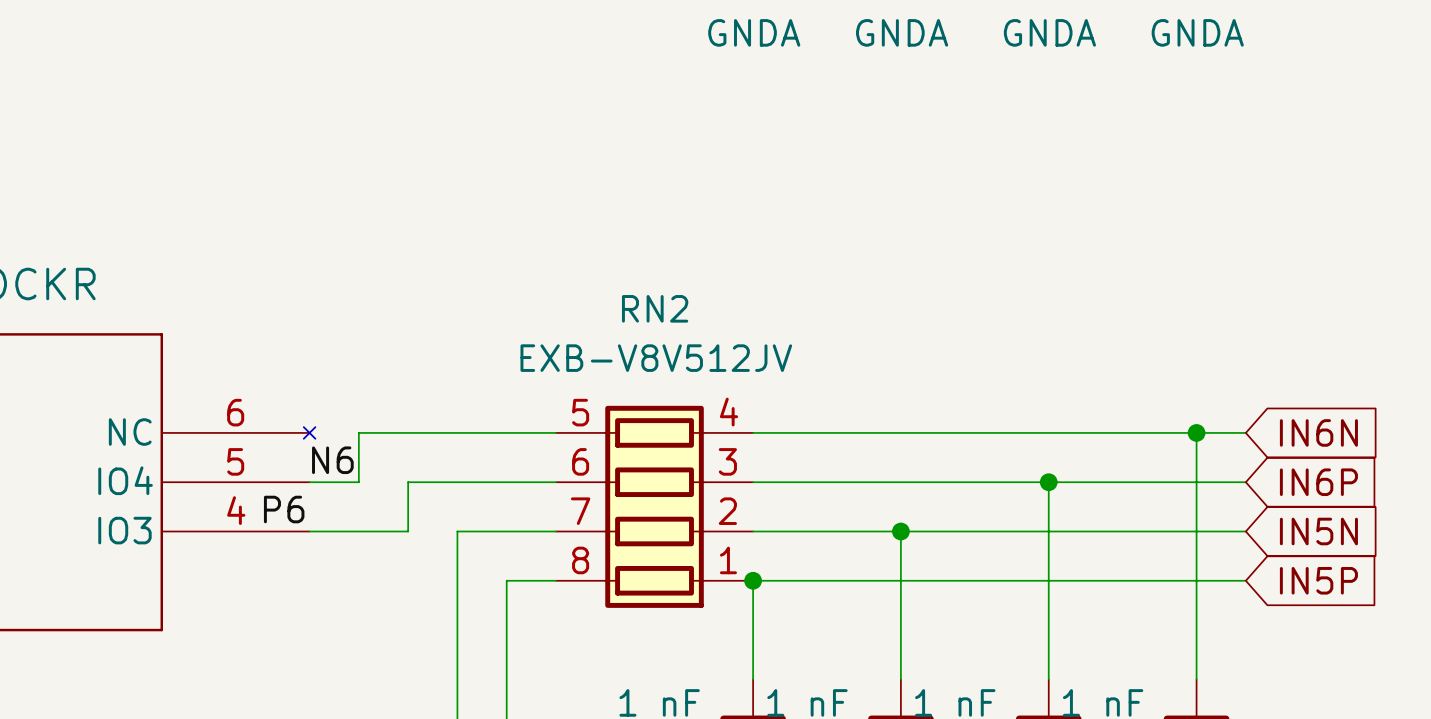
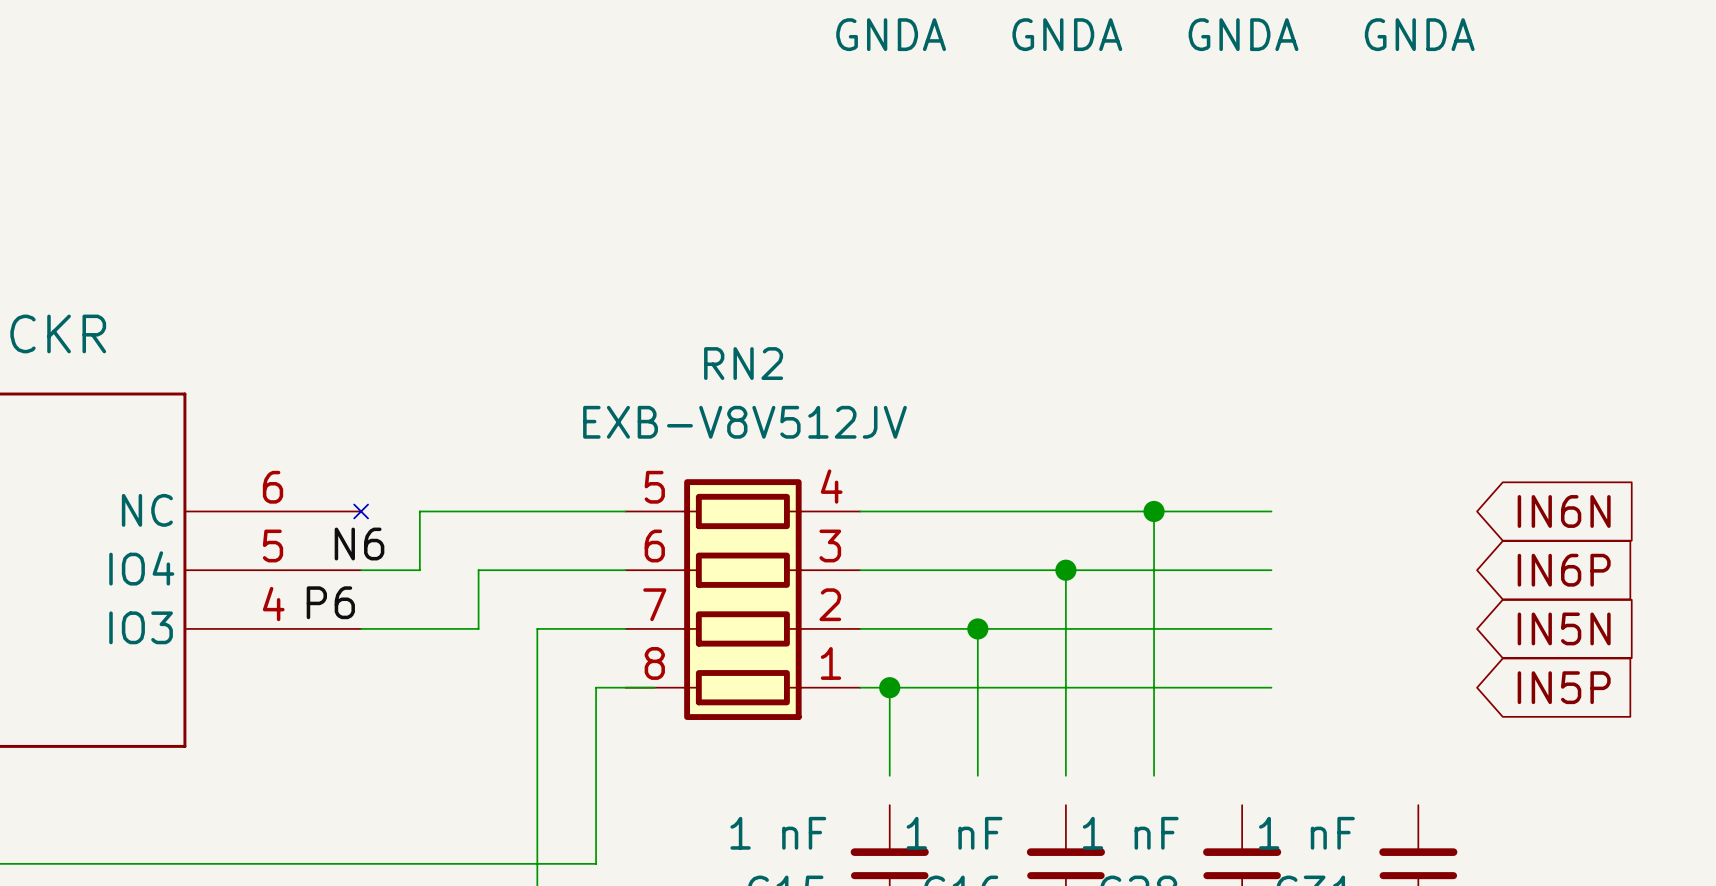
wire: none -> (1154, 511) (1154, 775)
junction: none -> (1154, 511)
wire: (1073, 432) (1245, 432) -> none
wire: (1196, 432) (1196, 679) -> none
junction: (1196, 432) -> none
label position: N6 (332, 460) -> N6 (359, 544)
wire: none -> (1065, 570) (1065, 628)
junction: none -> (1065, 570)
wire: (1048, 482) (1048, 679) -> none
junction: (1048, 482) -> none
wire: (1073, 482) (1245, 482) -> none
RN2 position: (654, 506) -> (742, 599)
wire: none -> (977, 628) (977, 775)
junction: none -> (977, 628)
junction: (900, 531) -> none
wire: (1073, 531) (1245, 531) -> none
wire: (1073, 580) (1245, 580) -> none
wire: (753, 654) (753, 679) -> none
wire: (900, 654) (900, 679) -> none

